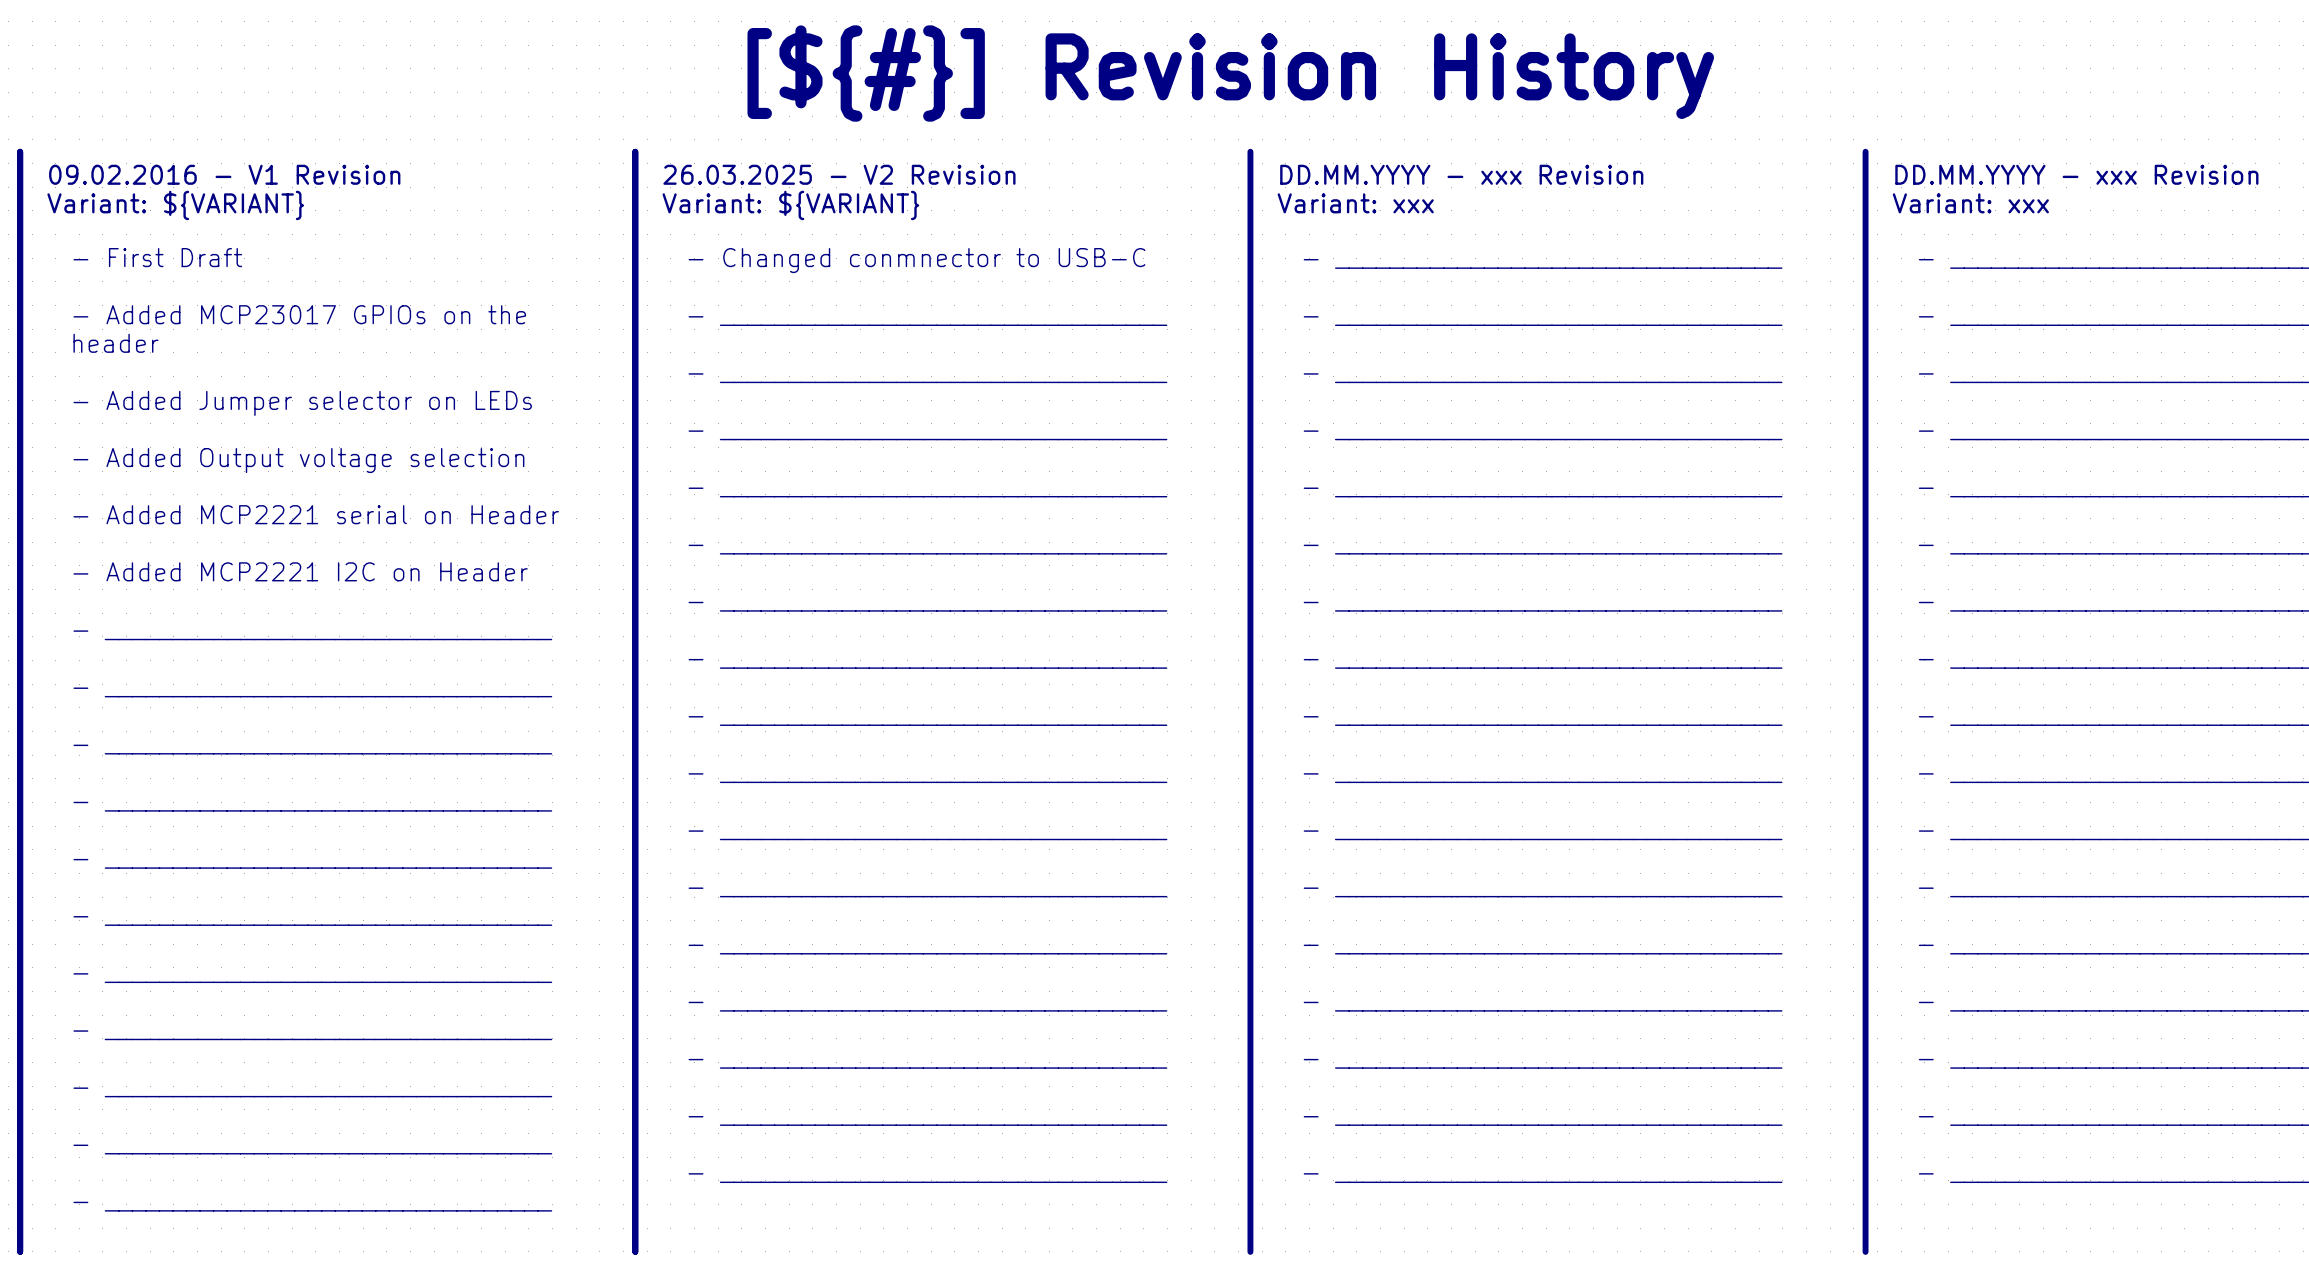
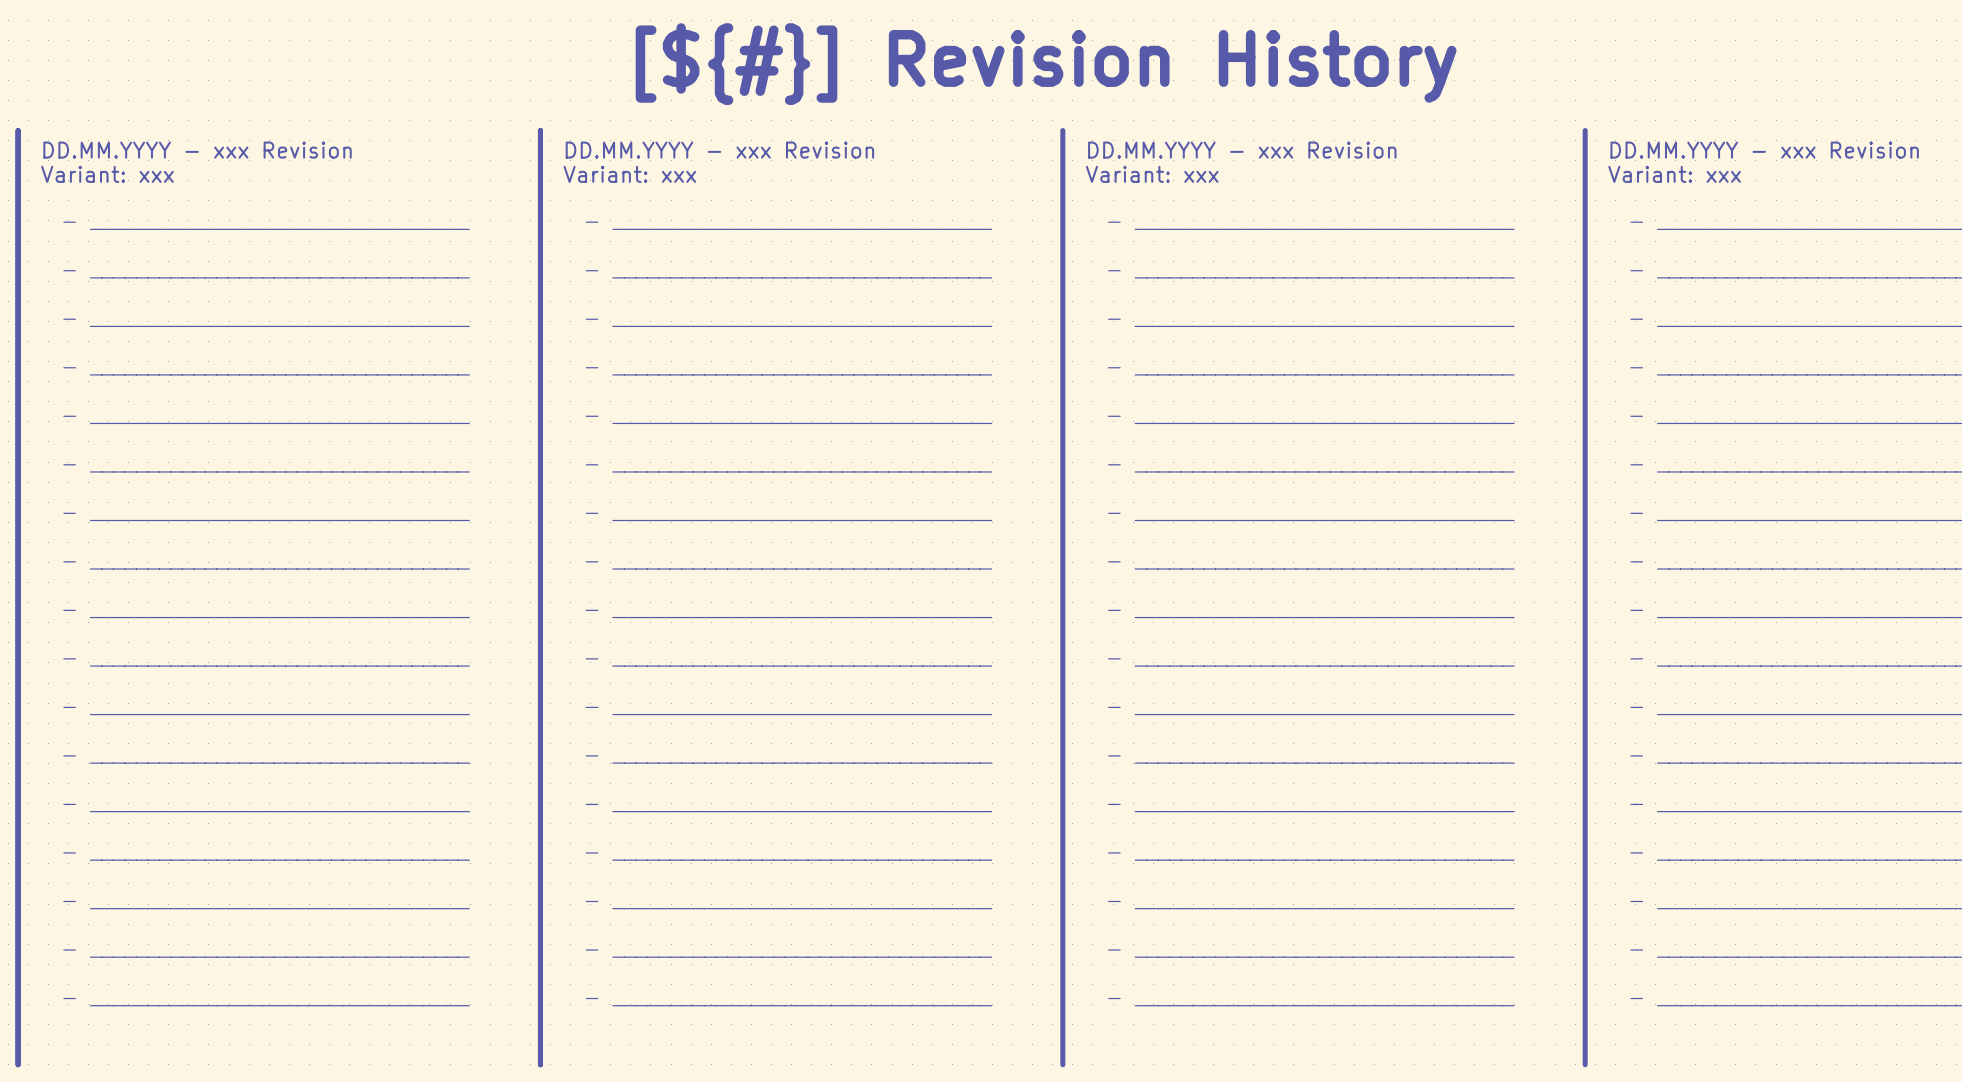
text: 09.02.2016 - V1 Revision (224, 174) -> DD.MM.YYYY - xxx Revision (197, 150)
text: 26.03.2025 - V2 Revision (839, 174) -> DD.MM.YYYY - xxx Revision (719, 150)
text: Variant: ${VARIANT} (175, 205) -> Variant: xxx (107, 174)
text: Variant: ${VARIANT} (790, 205) -> Variant: xxx (629, 174)
text: - First Draft (157, 257) -> - _________________________________ (266, 225)
text: - Changed conmnector to USB-C (916, 260) -> - _________________________________ (788, 225)
text: - Added MCP23017 GPIOs on the (299, 314) -> - _________________________________ (266, 274)
text: header (115, 343) -> none
text: none -> - _________________________________ (266, 322)
text: - Added Jumper selector on LEDs (302, 403) -> none
text: none -> - _________________________________ (266, 371)
text: - Added Output voltage selection (298, 460) -> none
text: none -> - _________________________________ (266, 419)
text: - Added MCP2221 serial on Header (316, 514) -> none
text: none -> - _________________________________ (266, 468)
text: - Added MCP2221 I2C on Header (300, 571) -> none
text: none -> - _________________________________ (266, 516)
text: - _________________________________ (312, 635) -> none
text: none -> - _________________________________ (266, 565)
text: - _________________________________ (312, 692) -> none
text: none -> - _________________________________ (266, 613)
text: - _________________________________ (312, 749) -> none
text: none -> - _________________________________ (266, 662)
text: - _________________________________ (312, 806) -> none
text: none -> - _________________________________ (266, 710)
text: - _________________________________ (312, 863) -> none
text: none -> - _________________________________ (266, 759)
text: - _________________________________ (312, 920) -> none
text: none -> - _________________________________ (266, 808)
text: - _________________________________ (312, 978) -> none
text: none -> - _________________________________ (266, 856)
text: - _________________________________ (312, 1035) -> none
text: none -> - _________________________________ (266, 905)
text: - _________________________________ (312, 1092) -> none
text: none -> - _________________________________ (266, 953)
text: - _________________________________ (312, 1149) -> none
text: none -> - _________________________________ (266, 1002)
text: - _________________________________ (312, 1206) -> none

